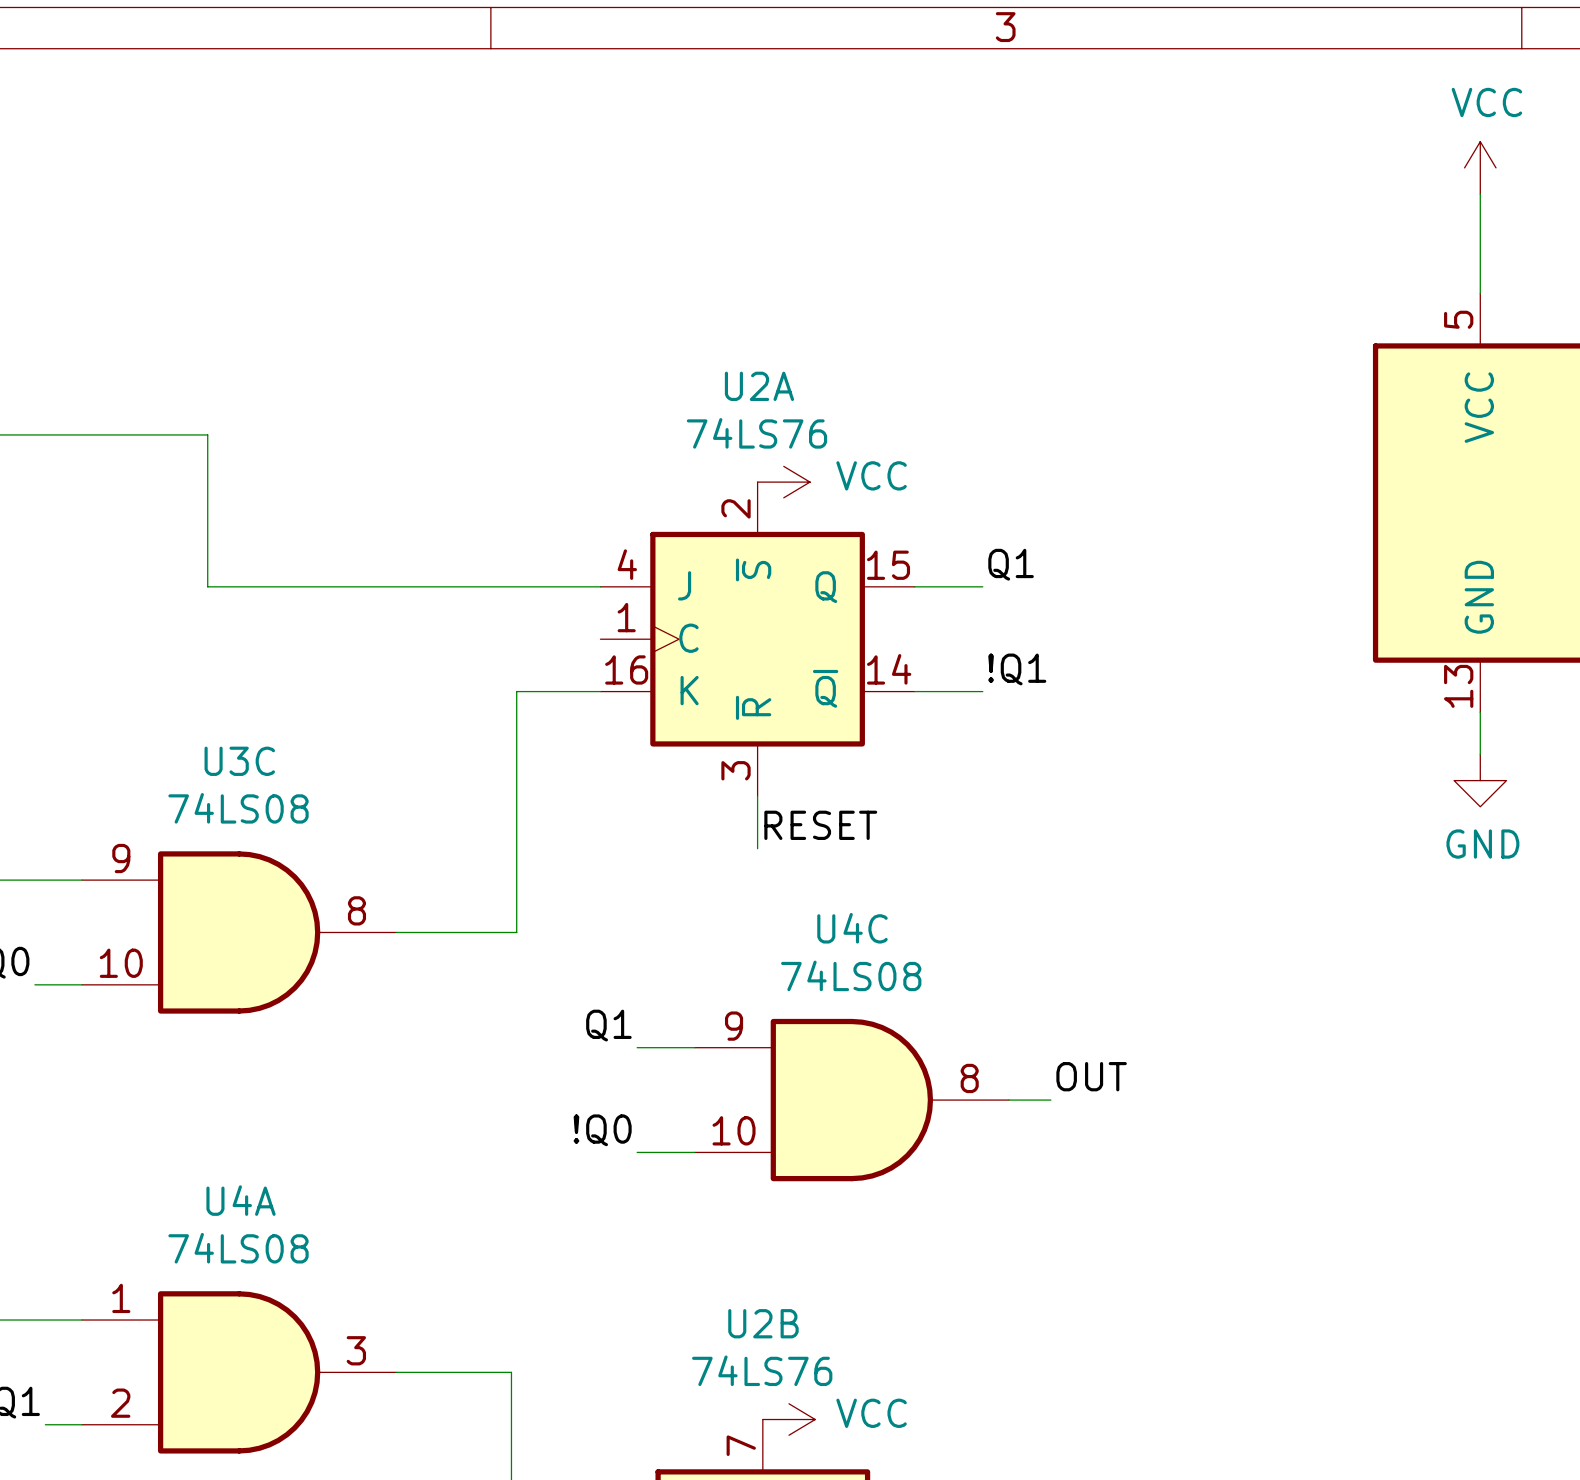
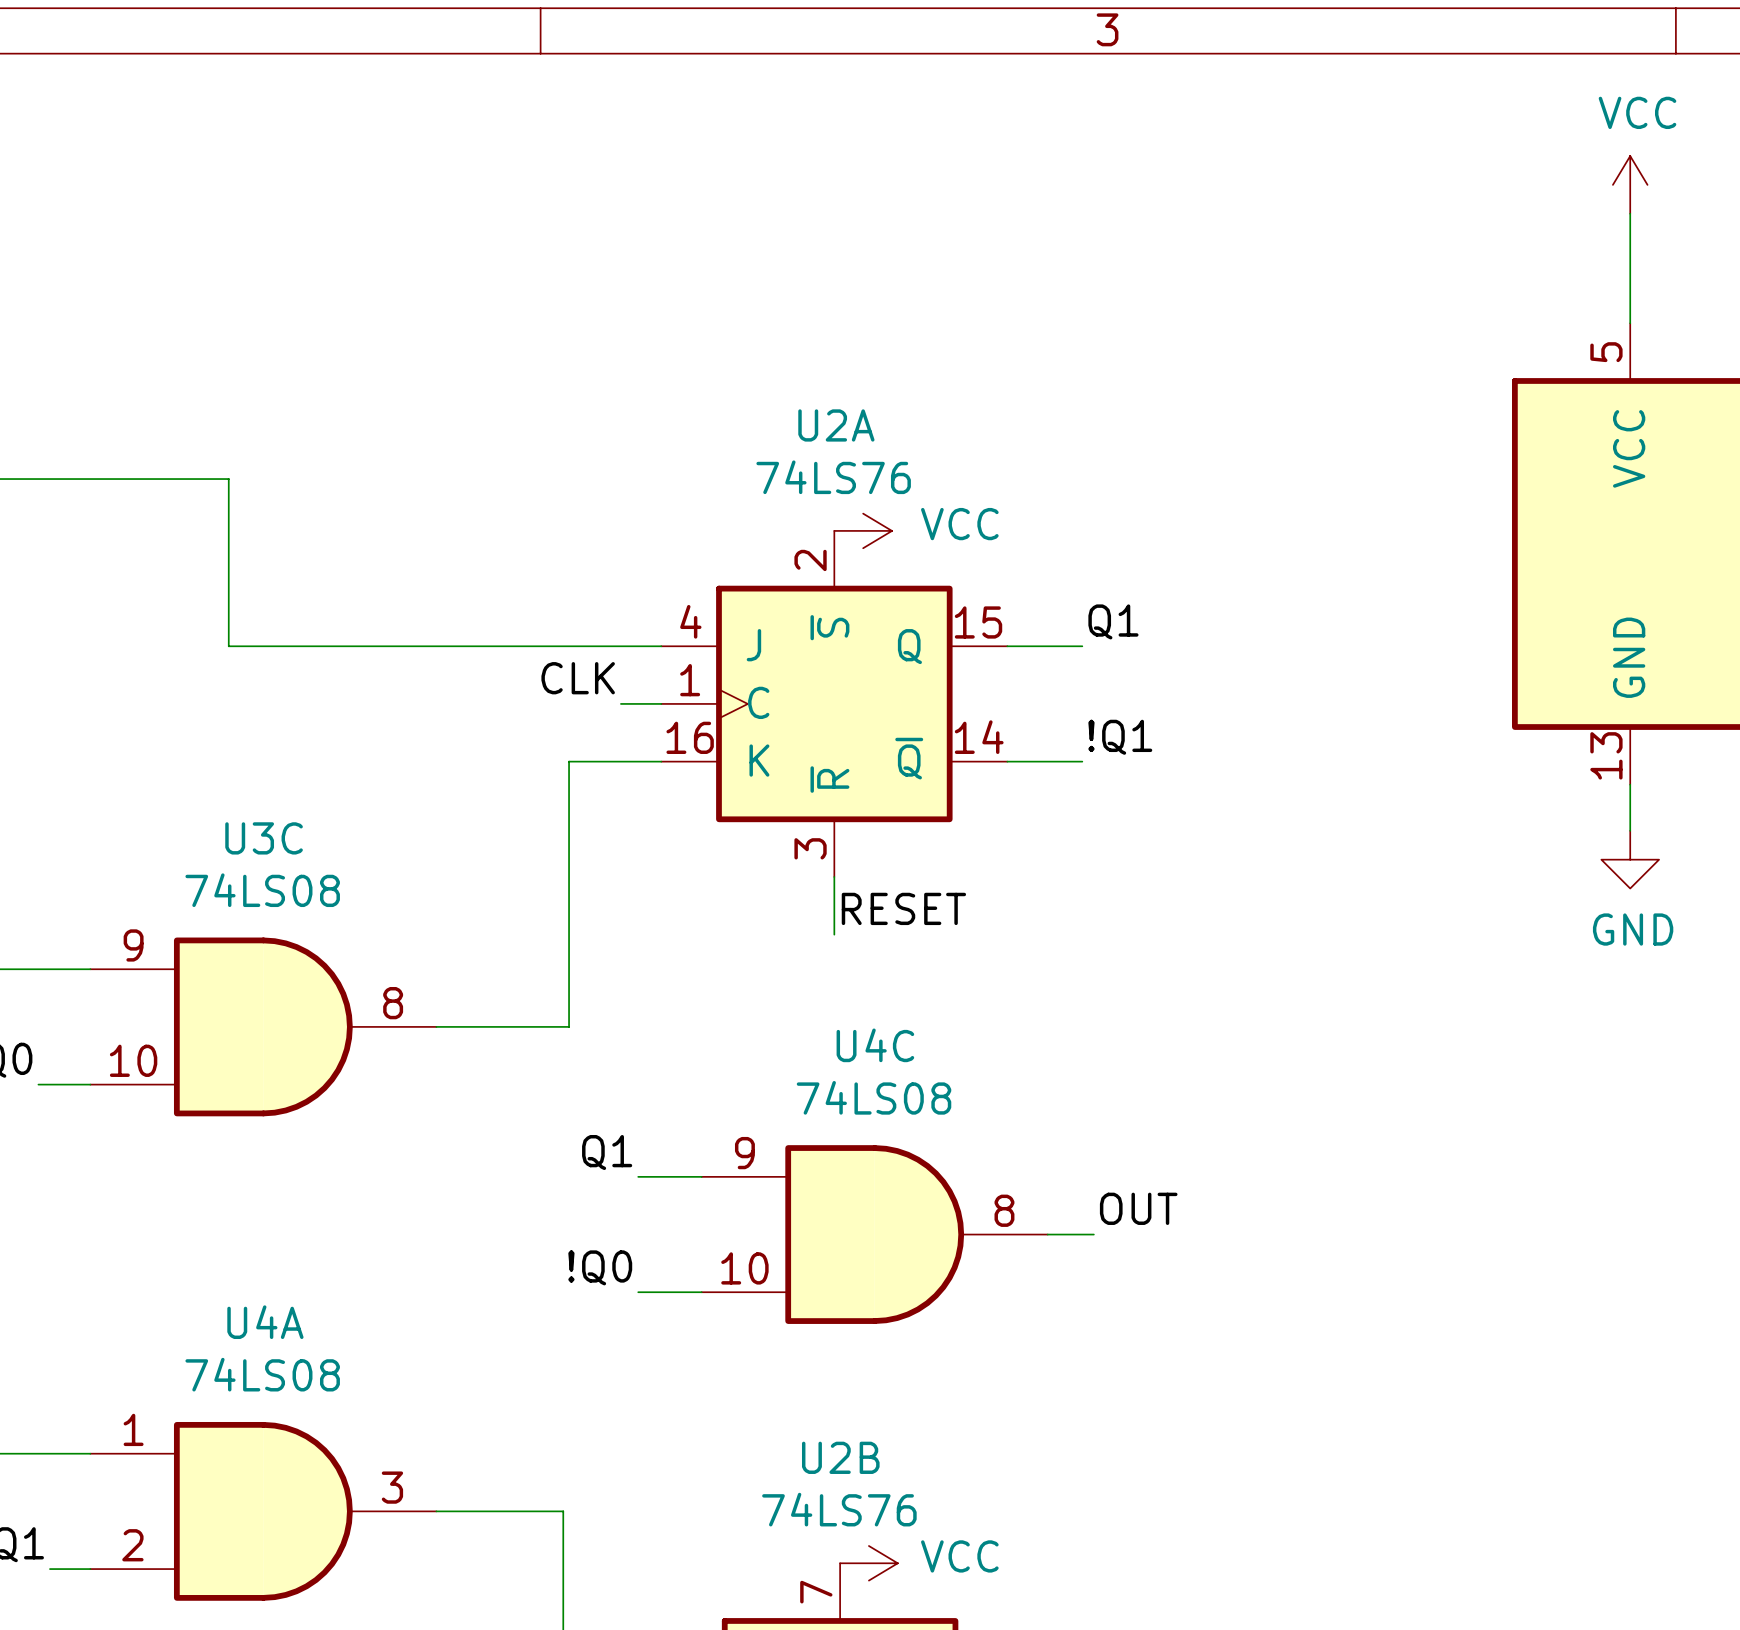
label: none -> CLK (578, 678)
wire: none -> (620, 703) (661, 703)
label position: Q1 (608, 1025) -> Q1 (607, 1152)
wire: (637, 1047) (694, 1047) -> (638, 1176) (701, 1176)
label position: OUT (1091, 1076) -> OUT (1138, 1208)
U4C position: (851, 1100) -> (874, 1234)
wire: (1008, 1100) (1050, 1100) -> (1047, 1234) (1093, 1234)
label position: !Q0 (602, 1130) -> !Q0 (600, 1267)
wire: (637, 1152) (694, 1152) -> (638, 1292) (701, 1292)

